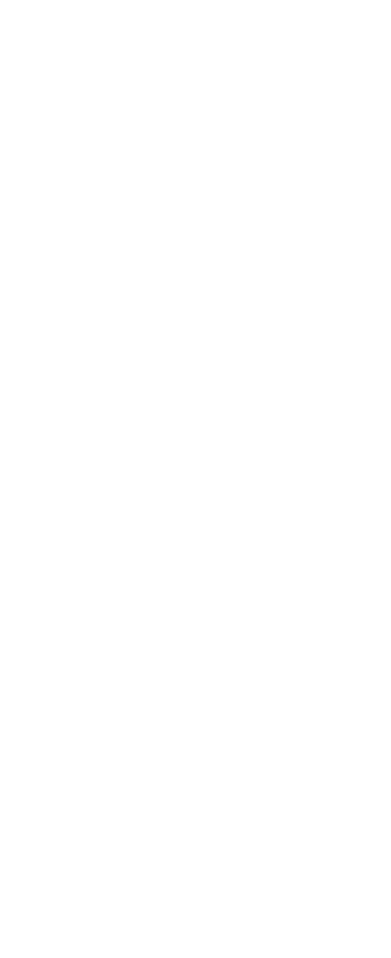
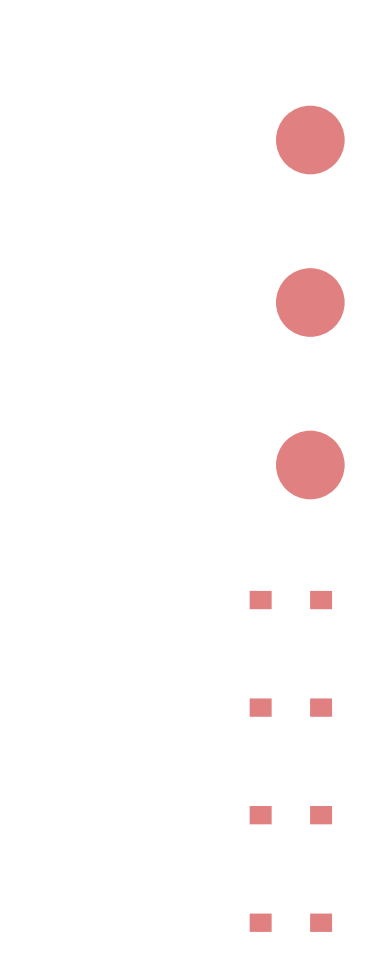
part: none -> (310, 140)
part: none -> (310, 302)
part: none -> (310, 465)
part: none -> (290, 600)
part: none -> (290, 707)
part: none -> (290, 815)
part: none -> (290, 922)

